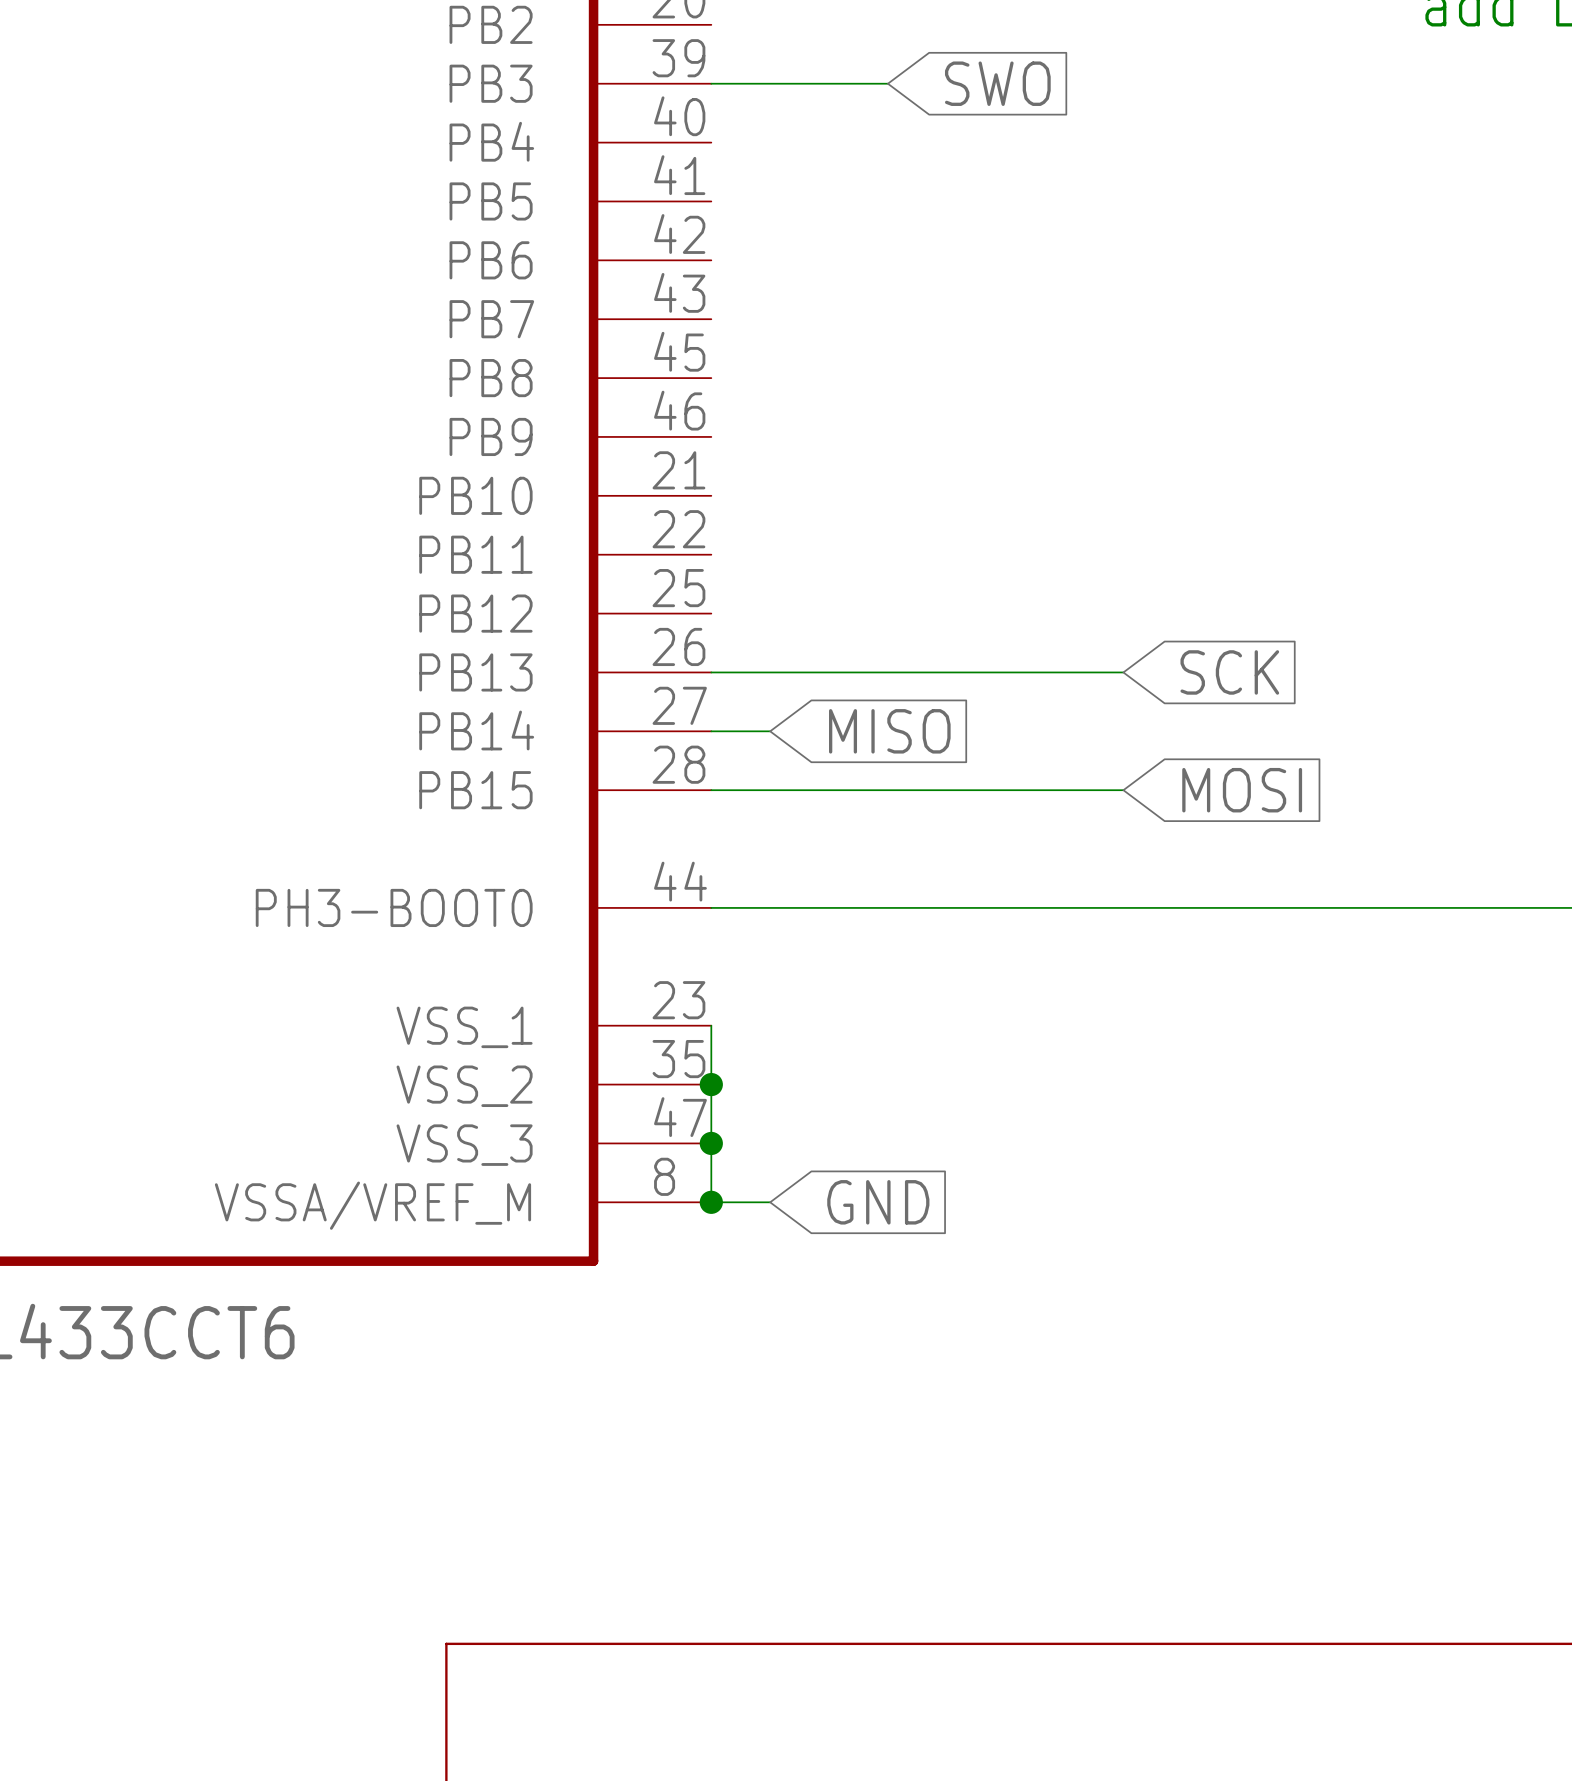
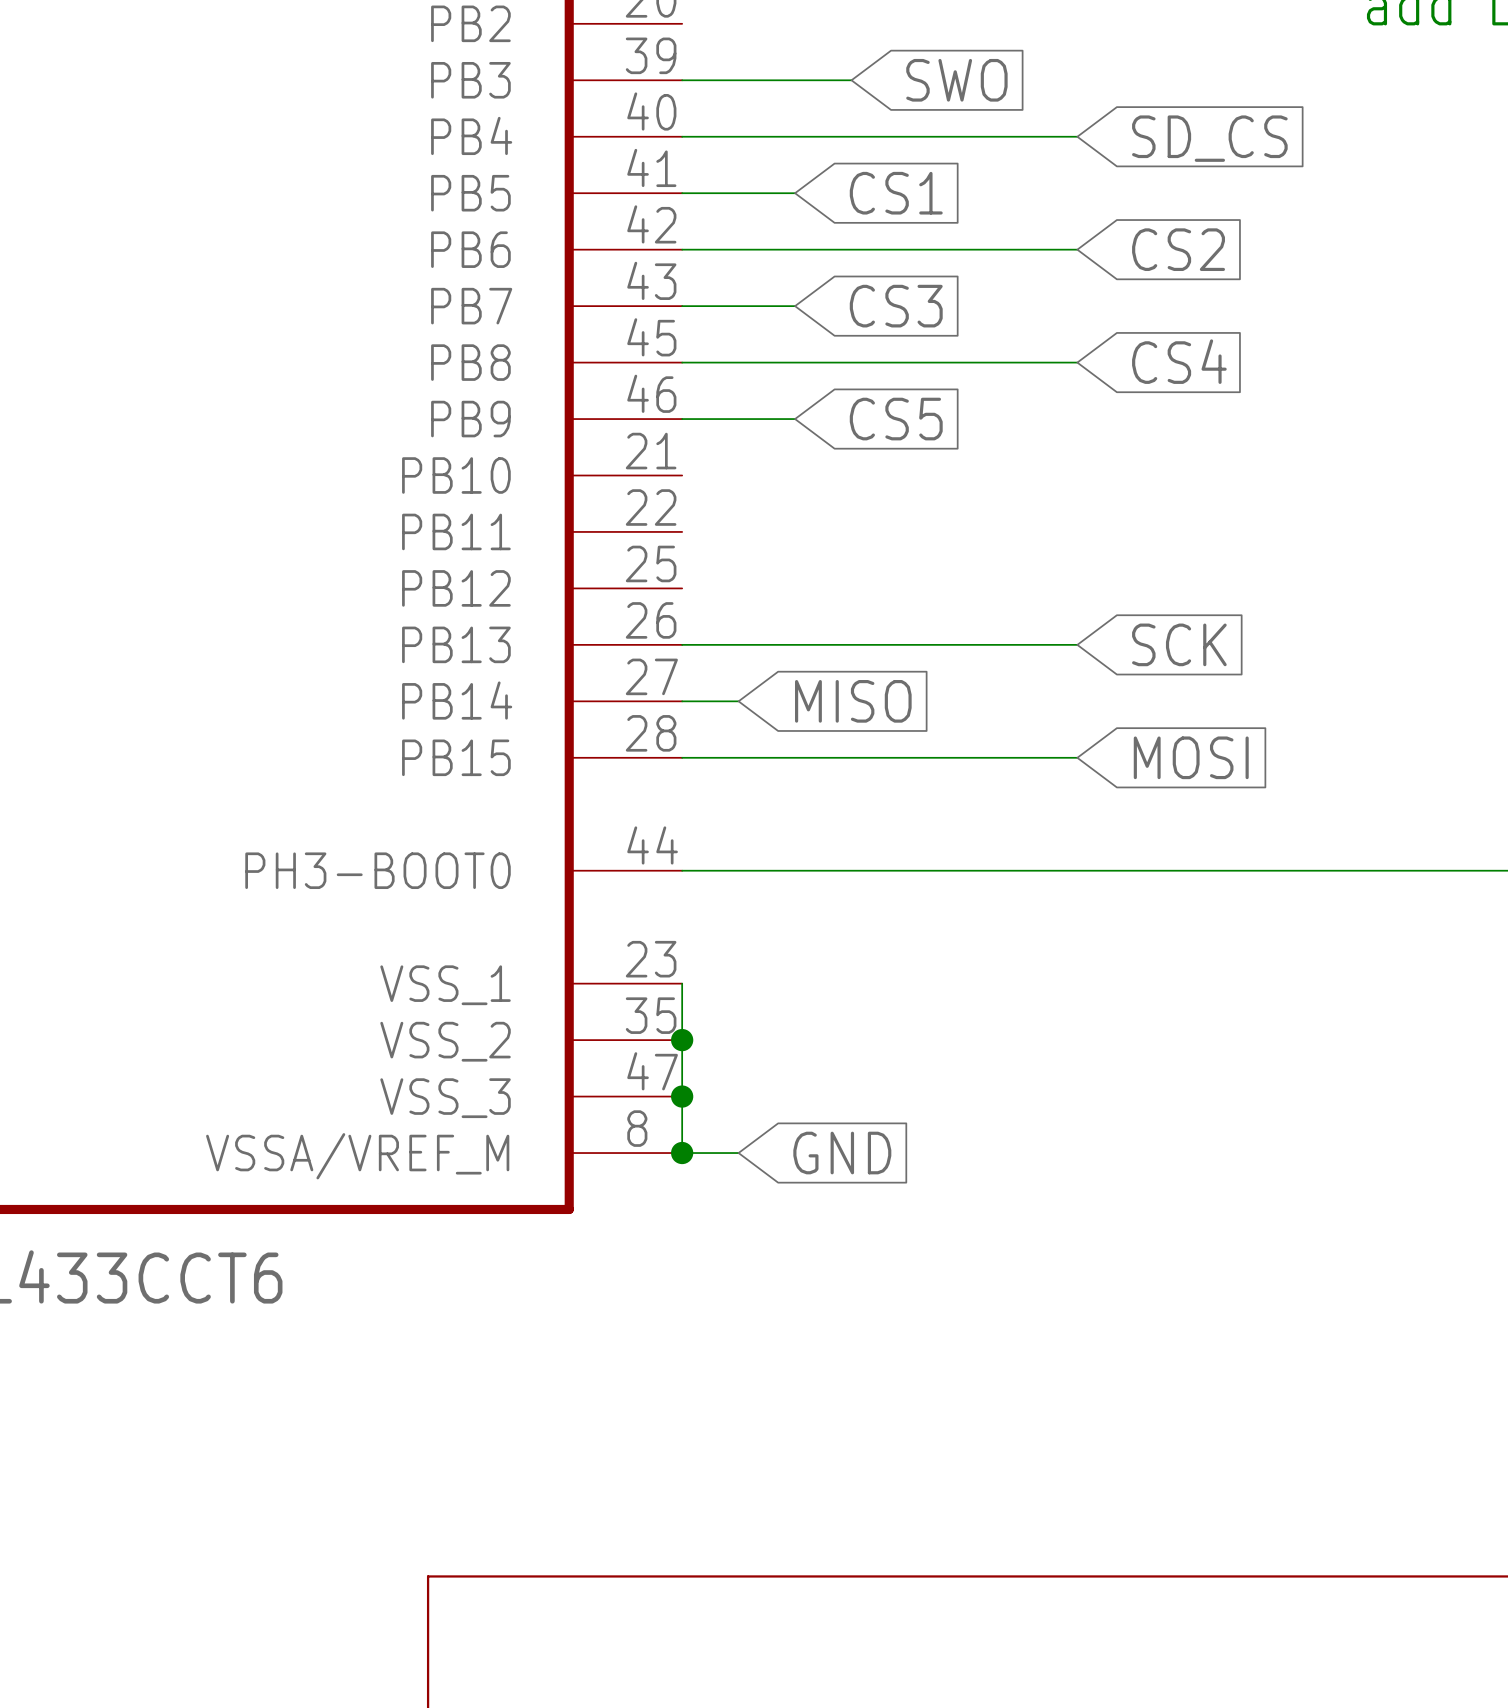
wire: none -> (682, 136) (1077, 136)
global label: none -> SD_CS (1209, 138)
wire: none -> (682, 193) (795, 193)
global label: none -> CS1 (896, 193)
wire: none -> (682, 249) (1077, 249)
global label: none -> CS2 (1178, 249)
wire: none -> (682, 306) (795, 306)
global label: none -> CS3 (896, 306)
global label: none -> CS4 (1179, 361)
wire: none -> (682, 362) (1077, 362)
wire: none -> (682, 419) (795, 419)
global label: none -> CS5 (896, 419)

